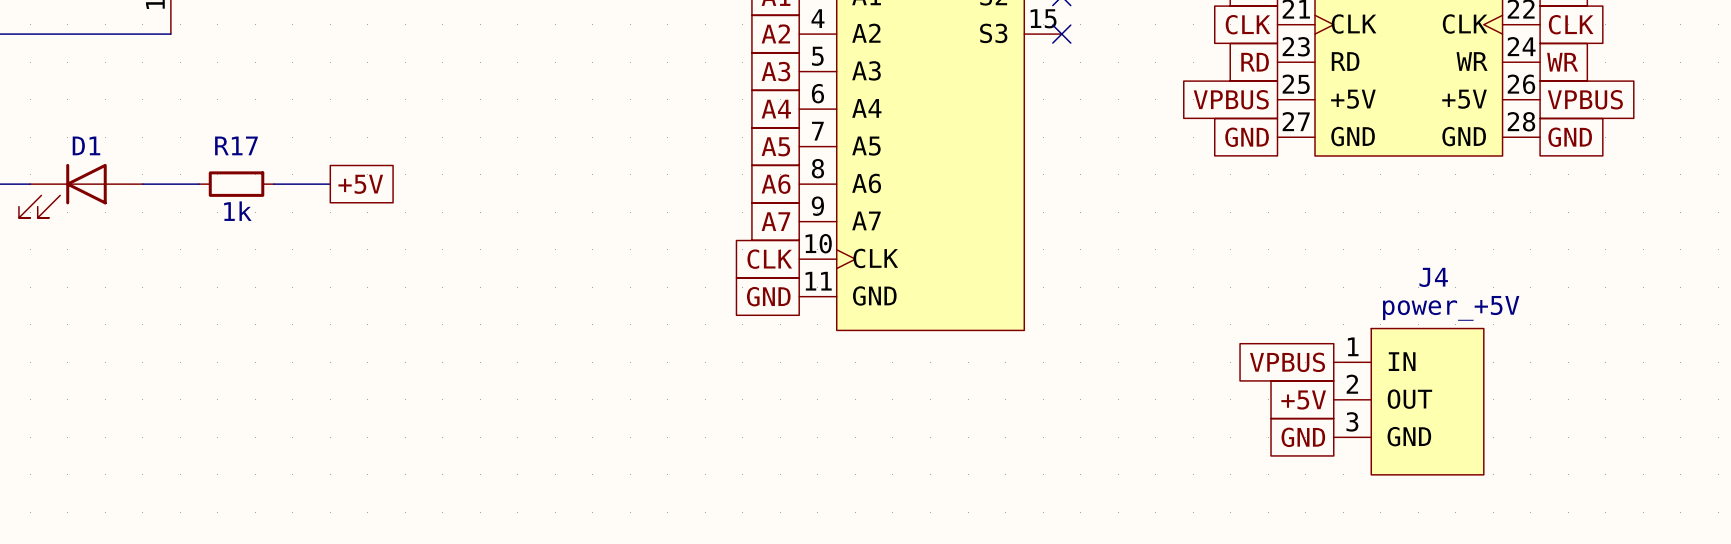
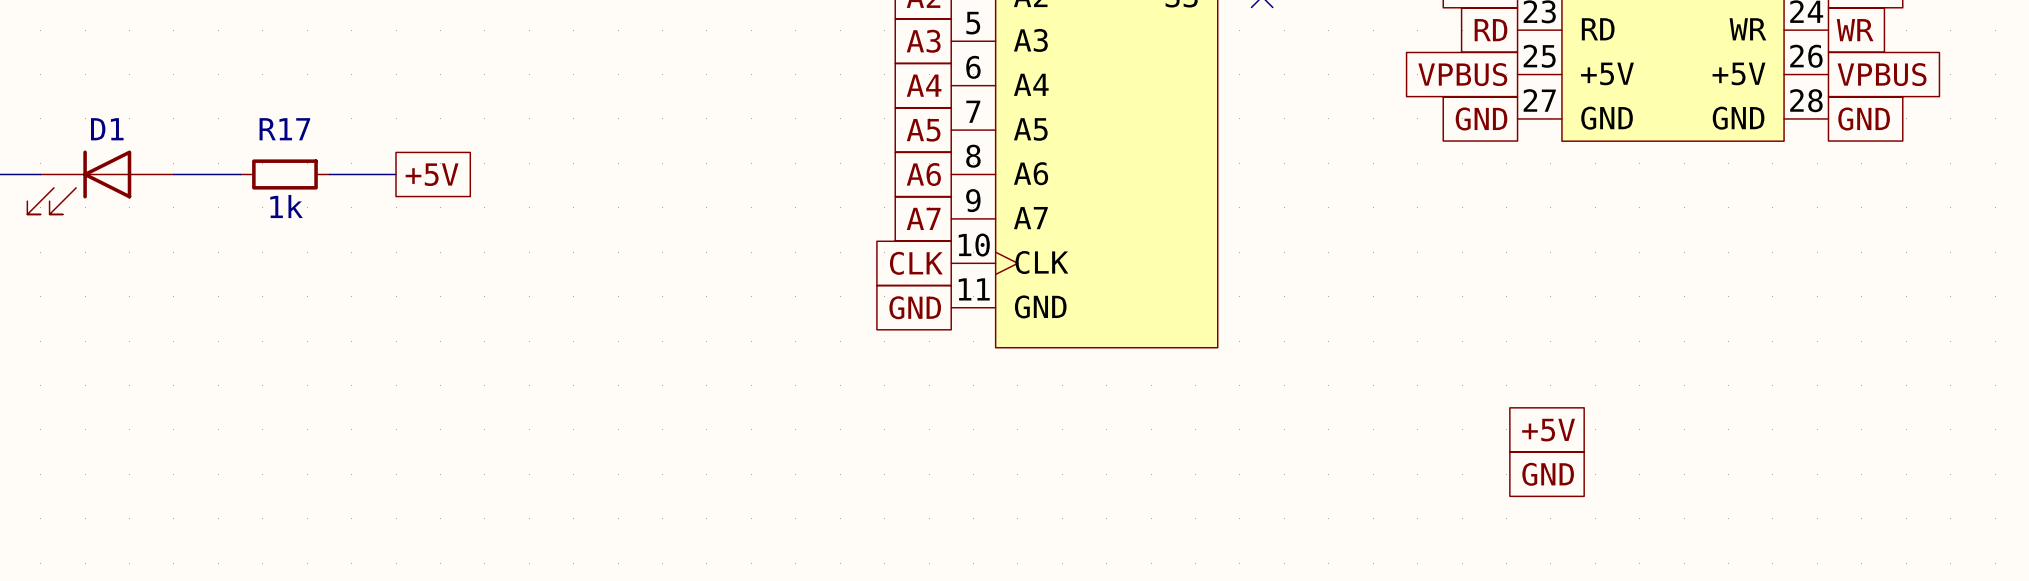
global label: VPBUS (1287, 362) -> none
J4: power_+5V (1408, 401) -> none

